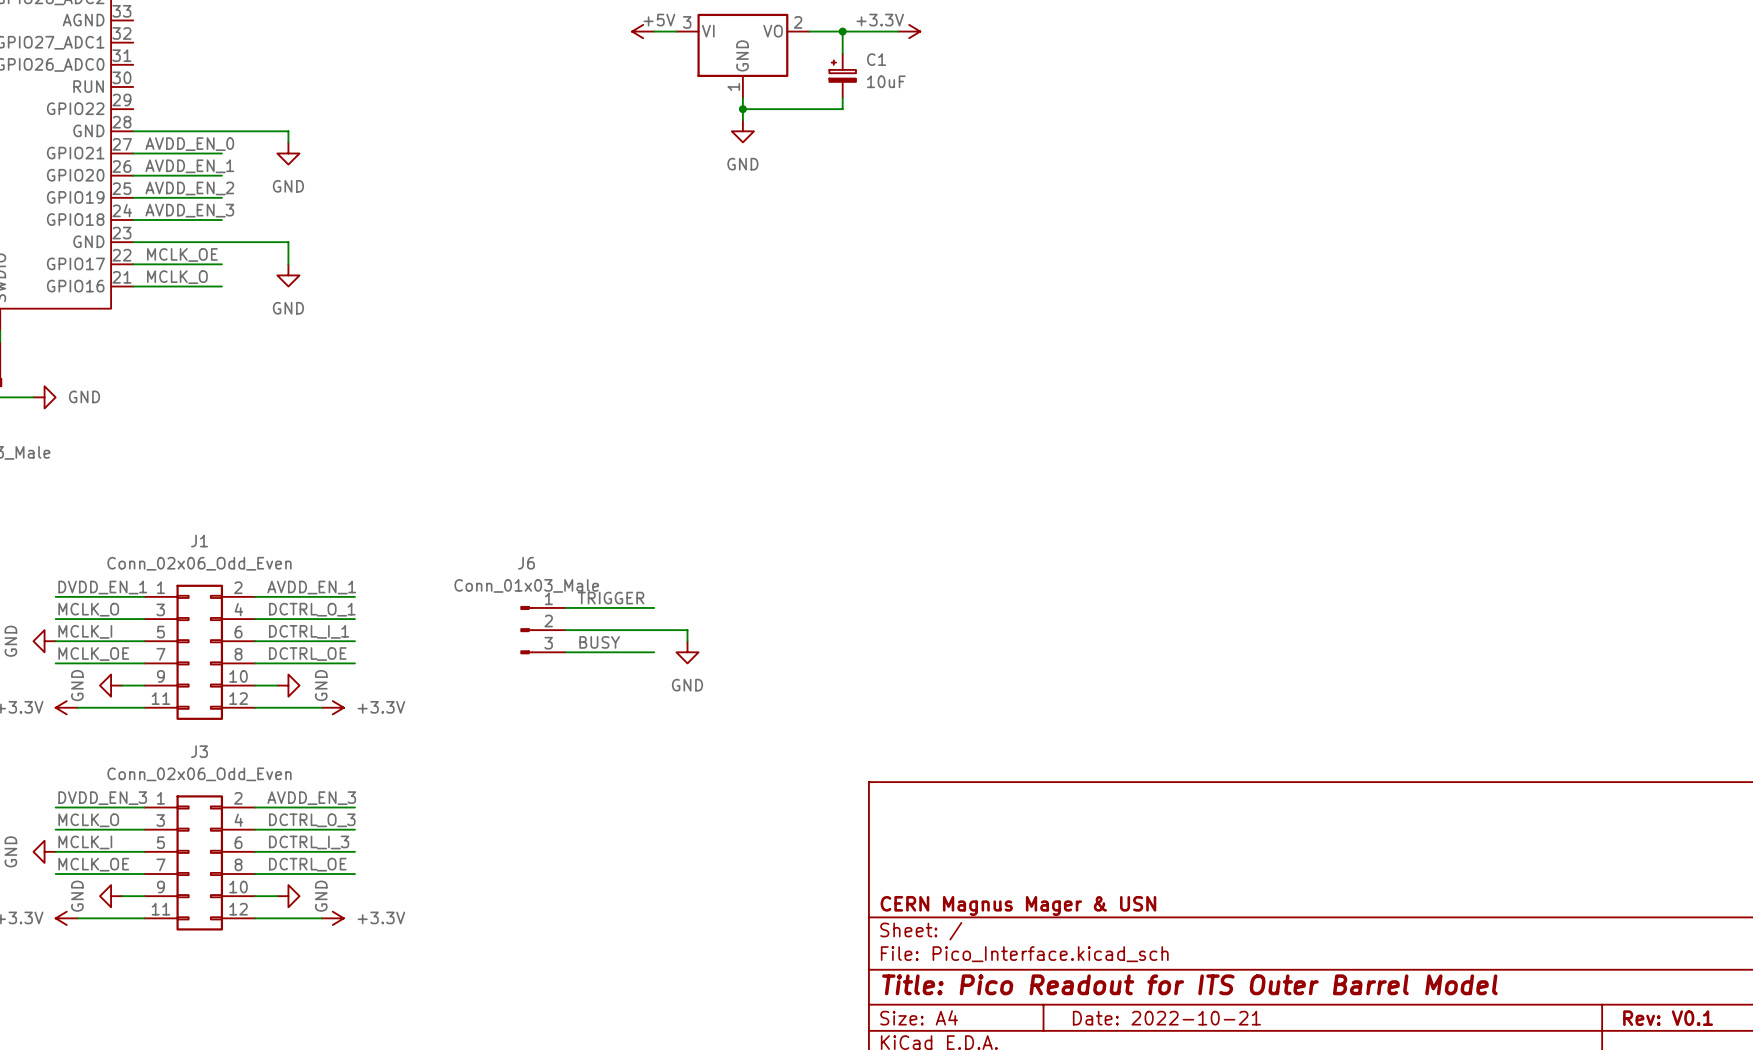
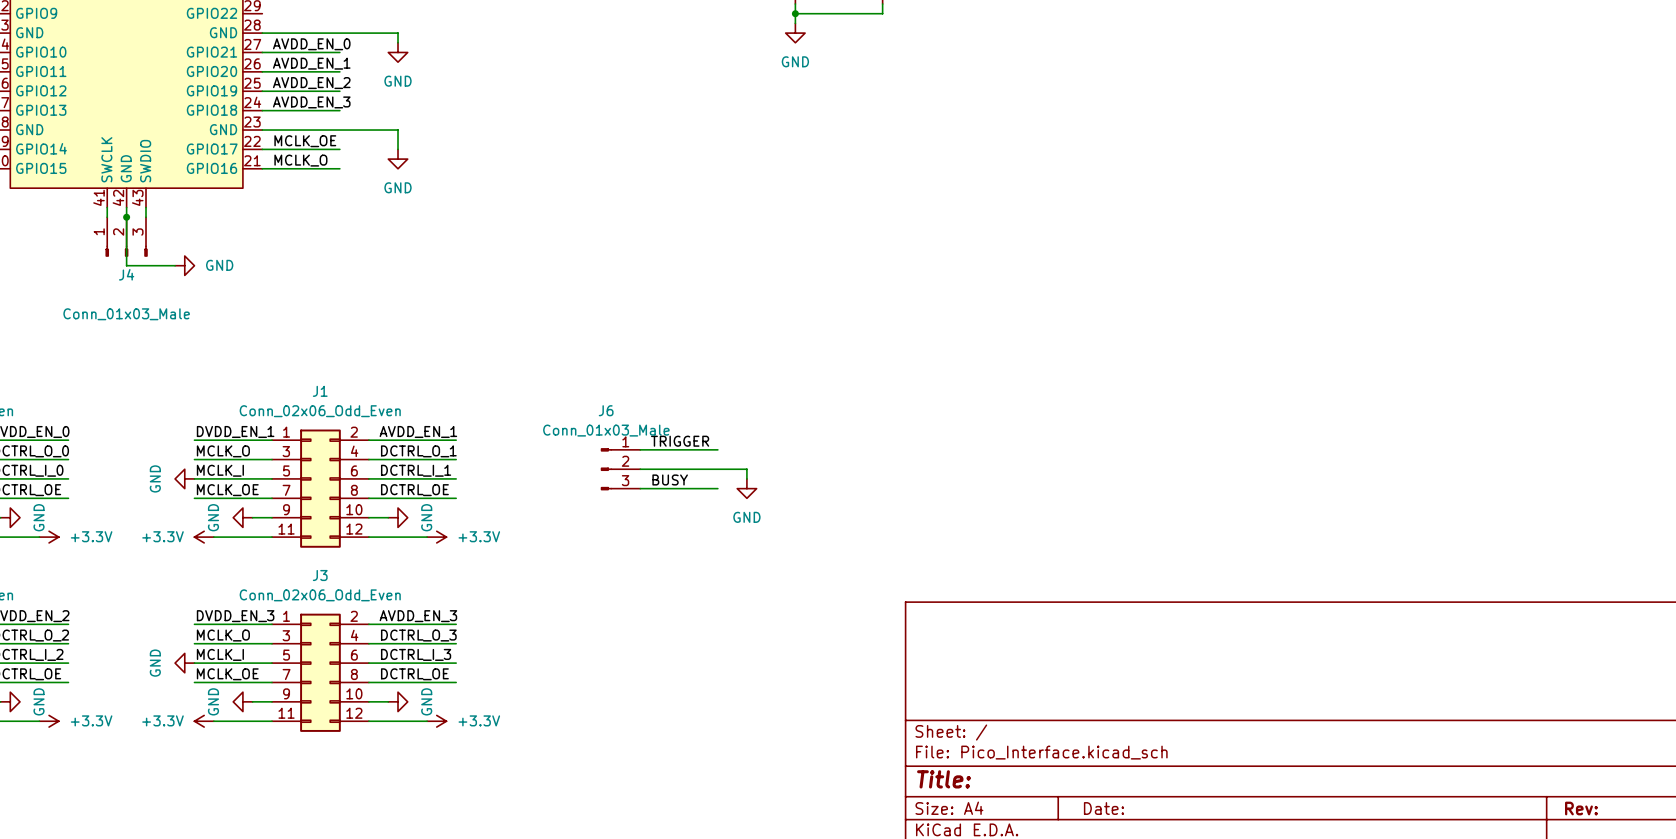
title block: CERN Magnus Mager & USN (1018, 905) -> none
title block: Title: Pico Readout for ITS Outer Barrel Model (1189, 984) -> Title: (943, 779)
title block: Date: 2022-10-21 (1166, 1018) -> Date: (1103, 808)
title block: Rev: V0.1 (1668, 1018) -> Rev: (1581, 808)

